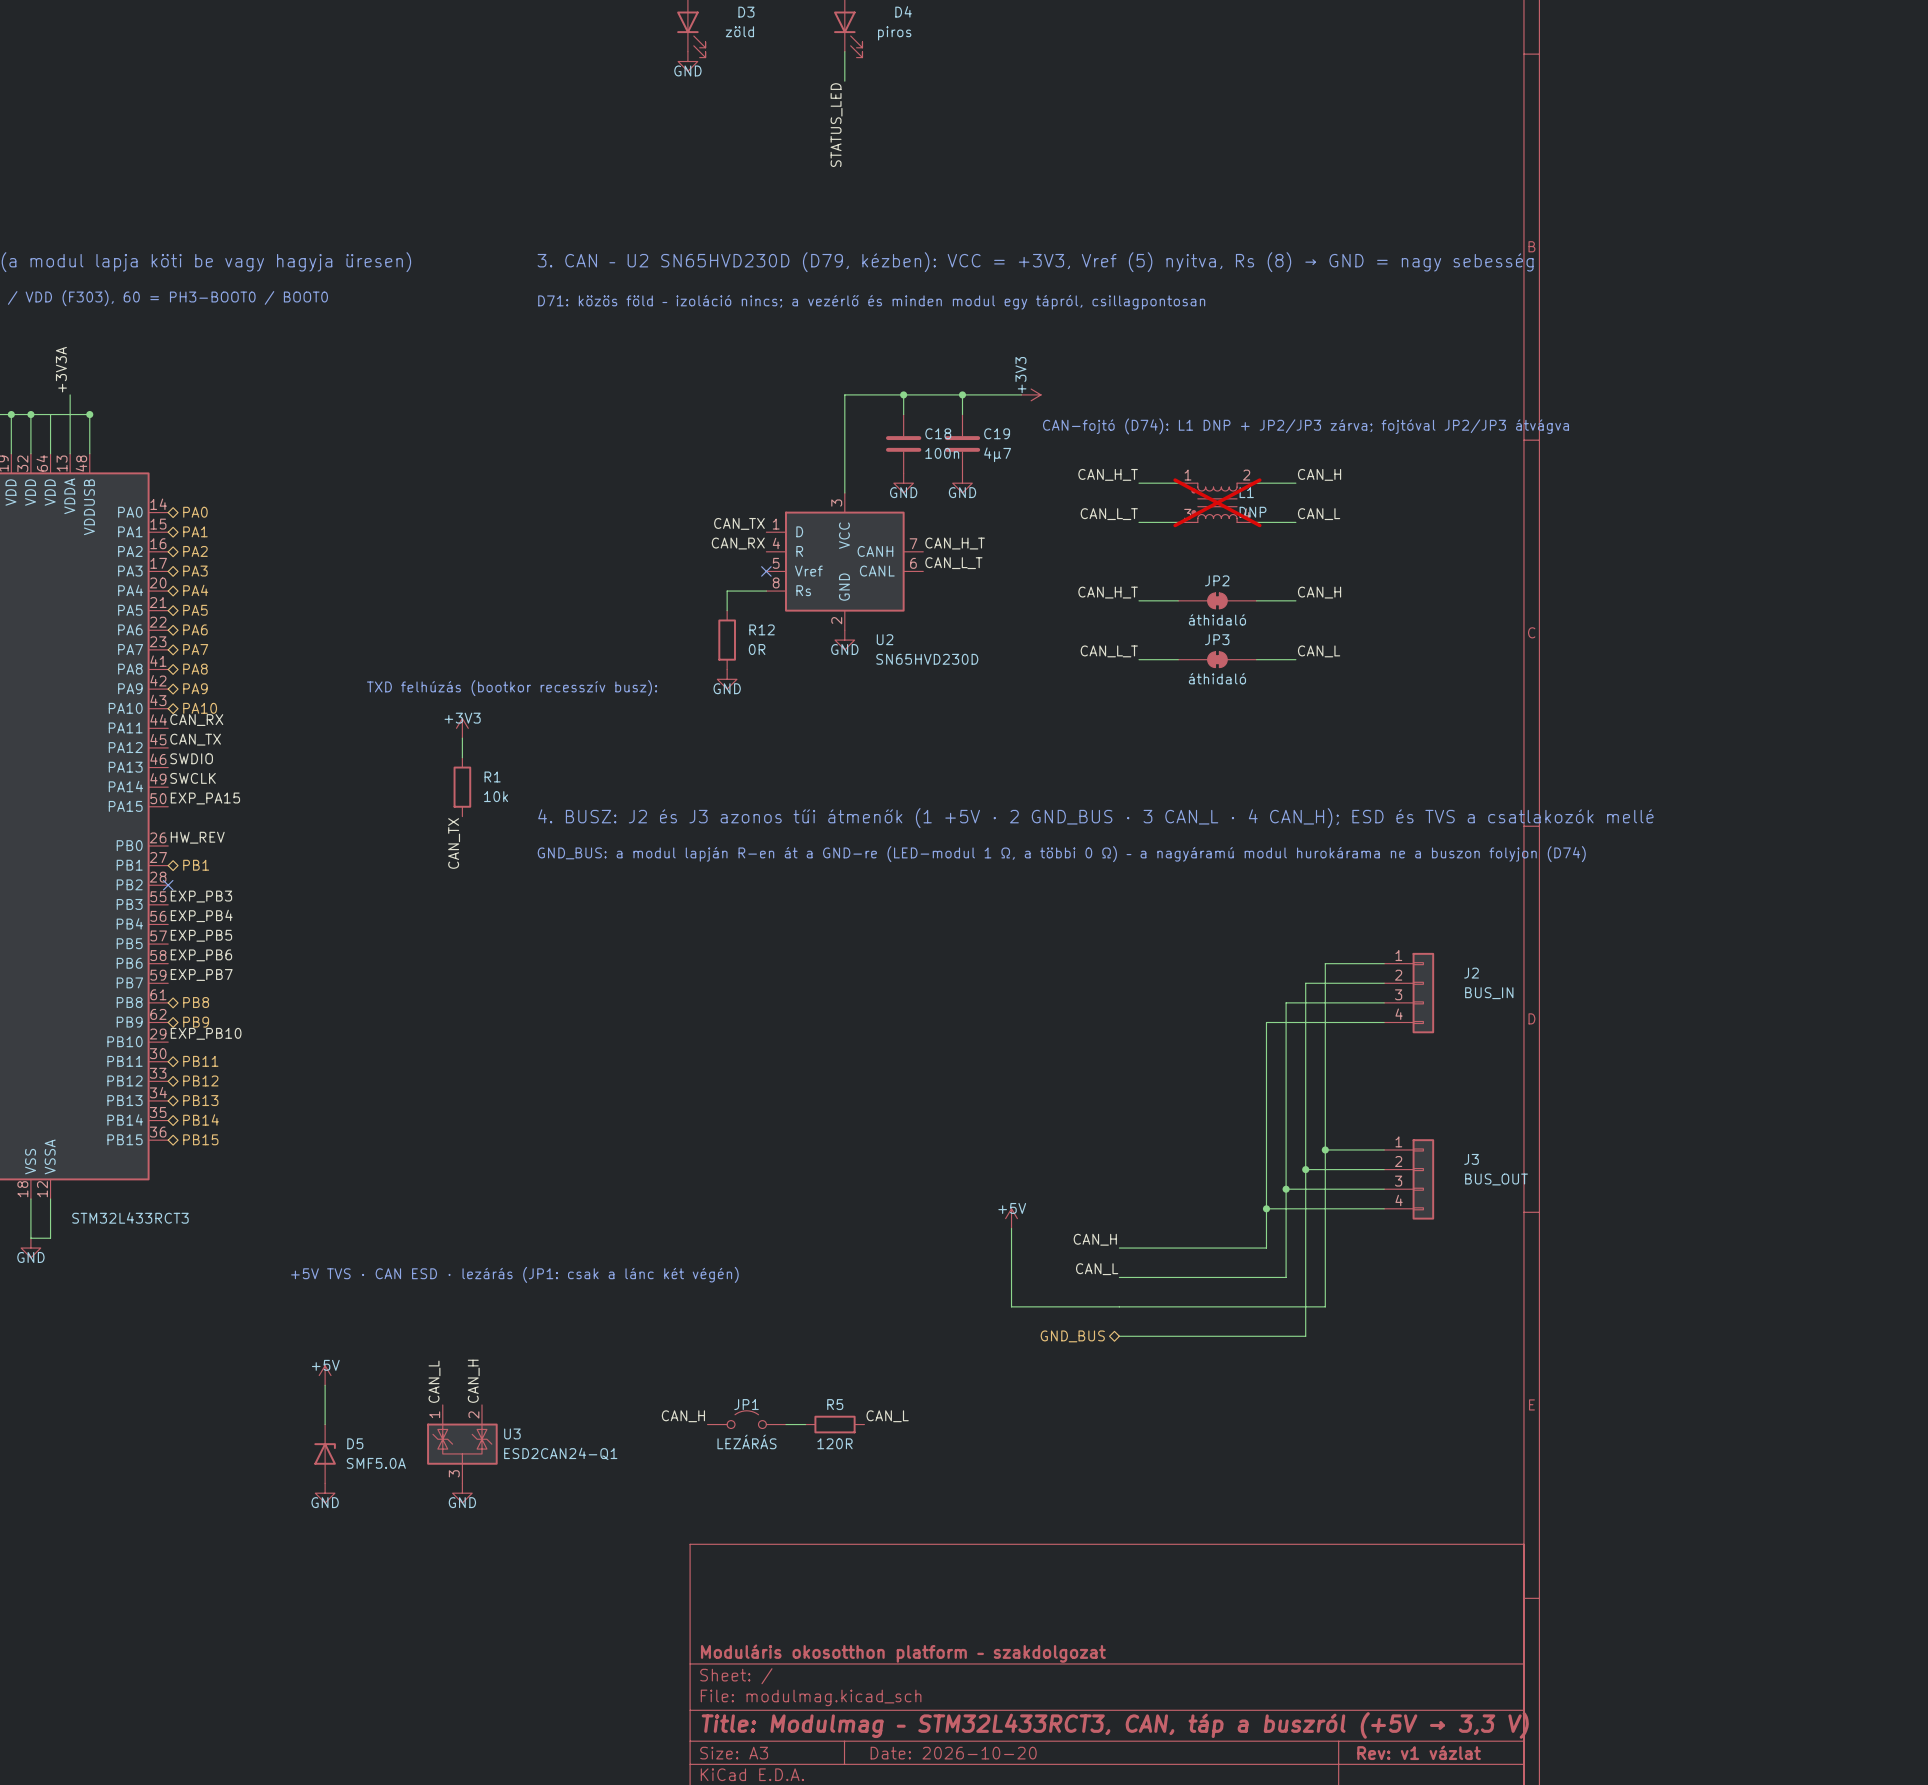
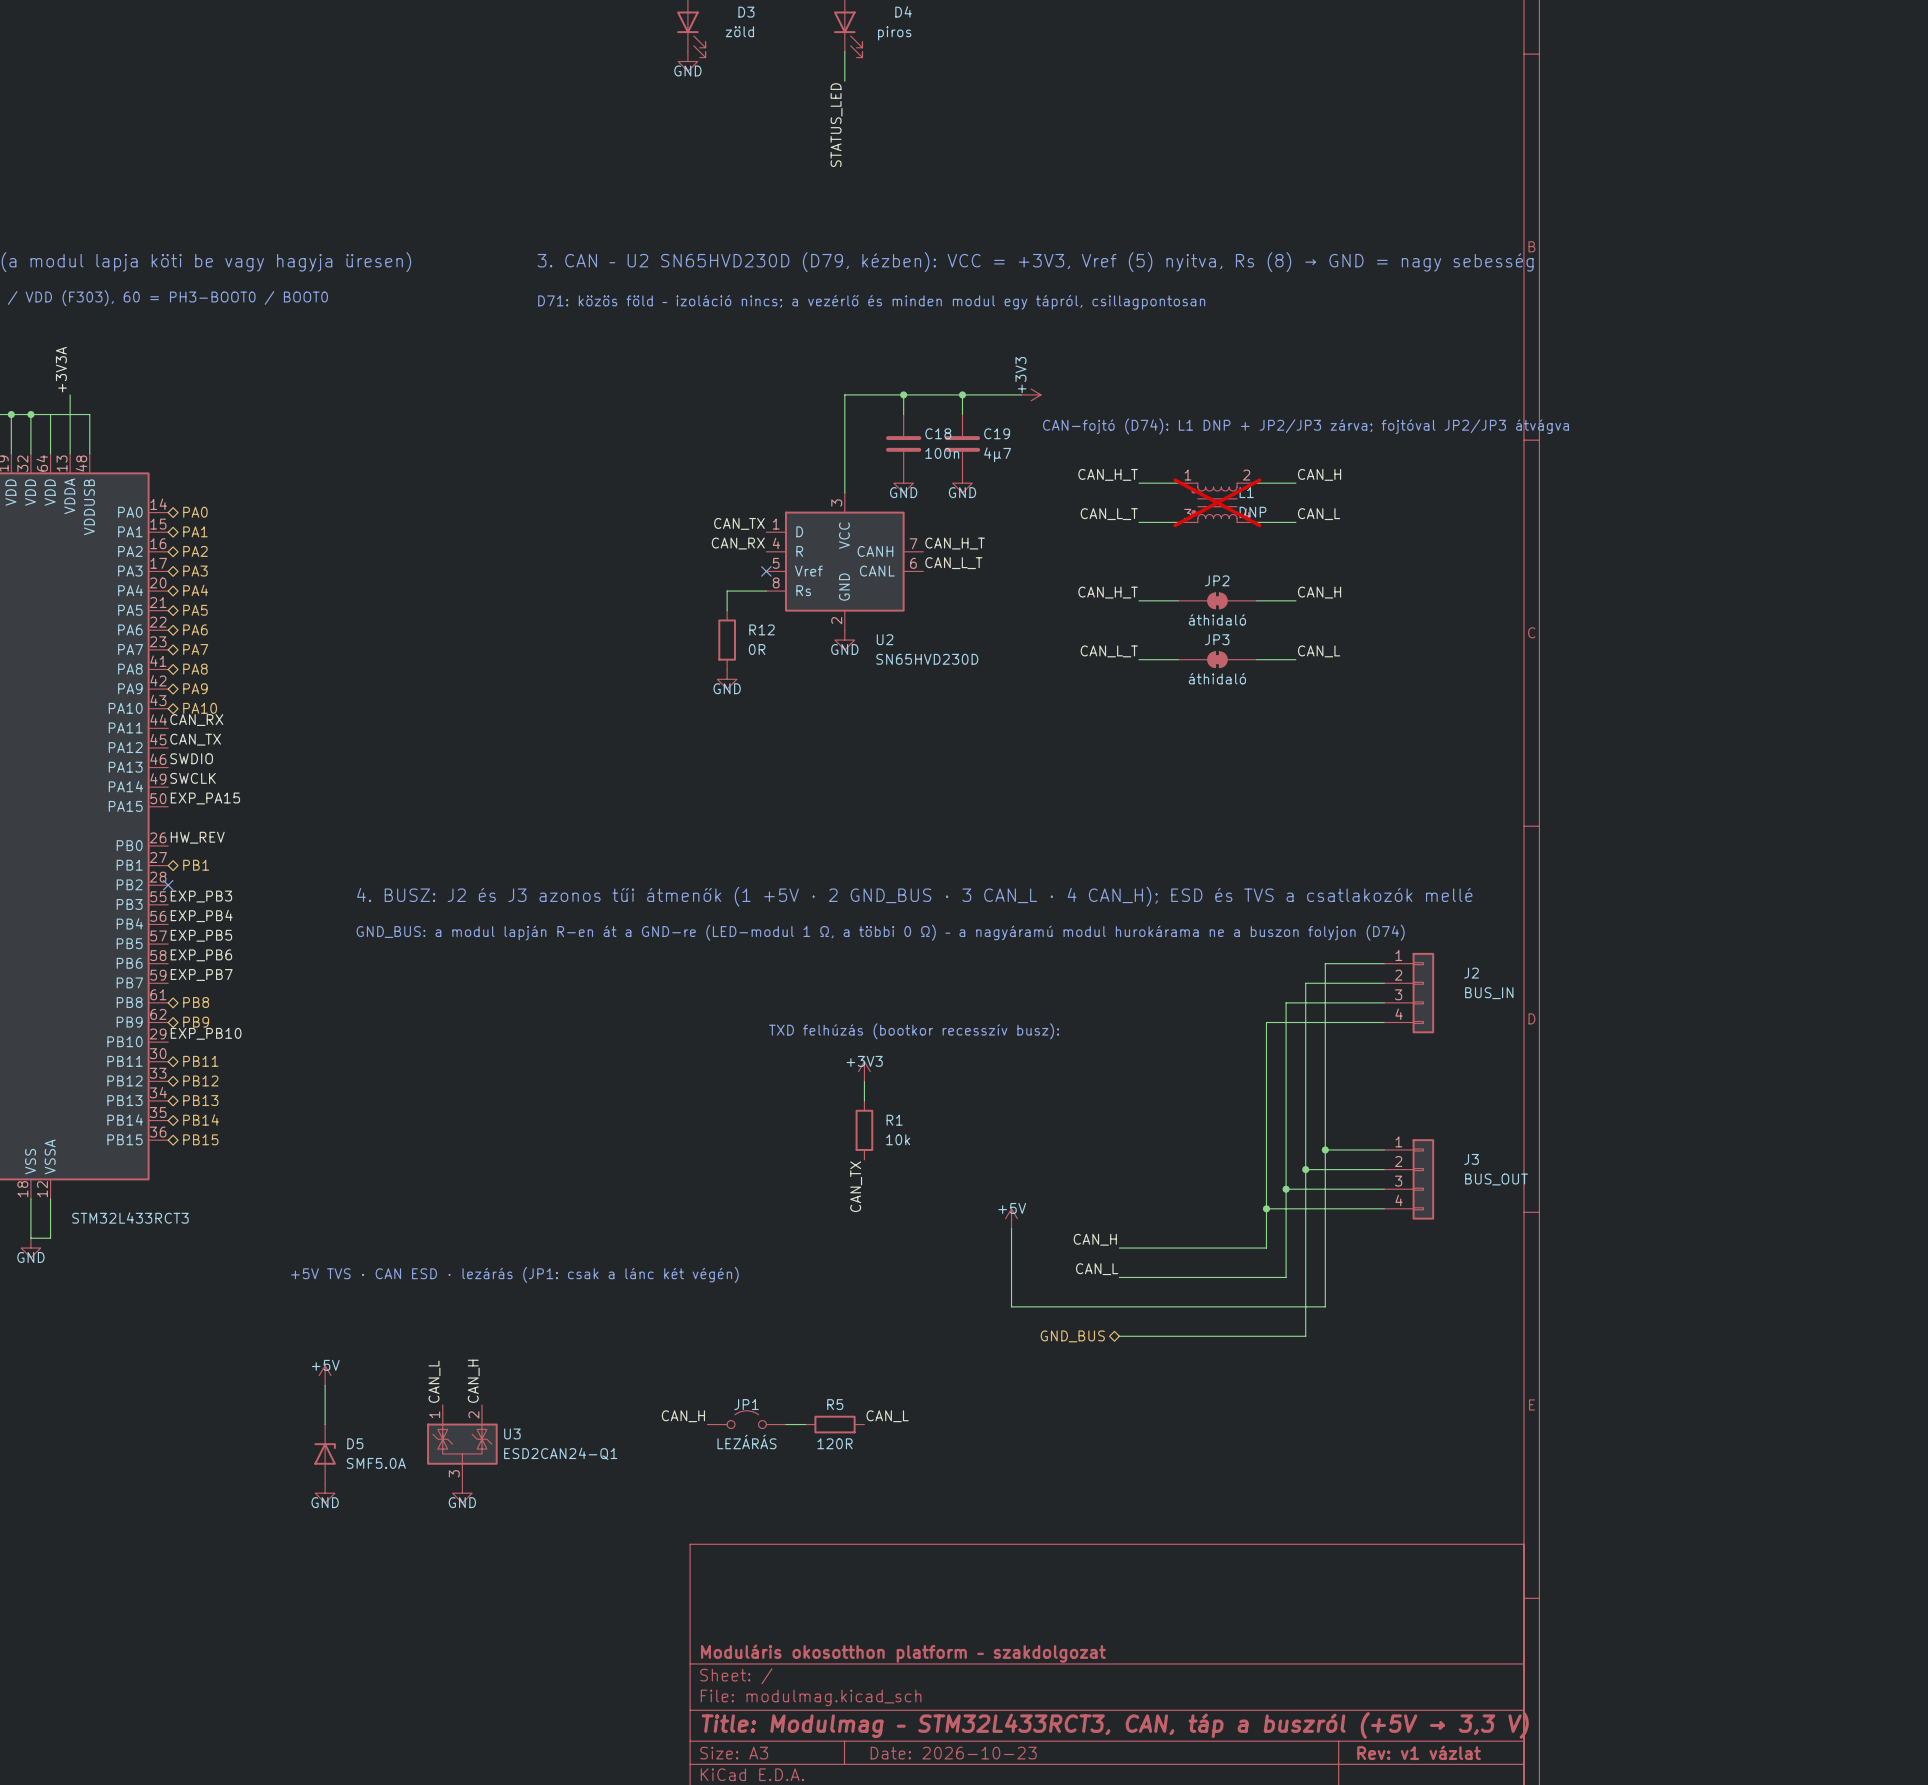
junction: (89, 414) -> none
text: TXD felhúzás (bootkor recesszív busz): (512, 688) -> none
power symbol: +3V3 (462, 728) -> none
wire: (462, 738) (462, 757) -> none
R1 position: (462, 787) -> (864, 1130)
text: 4. BUSZ: J2 és J3 azonos tűi átmenők (1 +5V · 2 GND_BUS · 3 CAN_L · 4 CAN_H); ESD és TVS a csatlakozók mellé (1095, 818) -> none
label: CAN_TX (454, 843) -> none
text: GND_BUS: a modul lapján R-en át a GND-re (LED-modul 1 Ω, a többi 0 Ω) – a nagyáramú modul hurokárama ne a buszon folyjon (D74) (1061, 854) -> none
text: none -> 4. BUSZ: J2 és J3 azonos tűi átmenők (1 +5V · 2 GND_BUS · 3 CAN_L · 4 CAN_H); ESD és TVS a csatlakozók mellé (914, 896)
text: none -> GND_BUS: a modul lapján R-en át a GND-re (LED-modul 1 Ω, a többi 0 Ω) – a nagyáramú modul hurokárama ne a buszon folyjon (D74) (880, 932)
text: none -> TXD felhúzás (bootkor recesszív busz): (914, 1031)
power symbol: none -> +3V3 (864, 1071)
wire: none -> (864, 1081) (864, 1100)
label: none -> CAN_TX (856, 1186)
title block: Date: 2026-10-20 (953, 1753) -> Date: 2026-10-23 (953, 1753)

